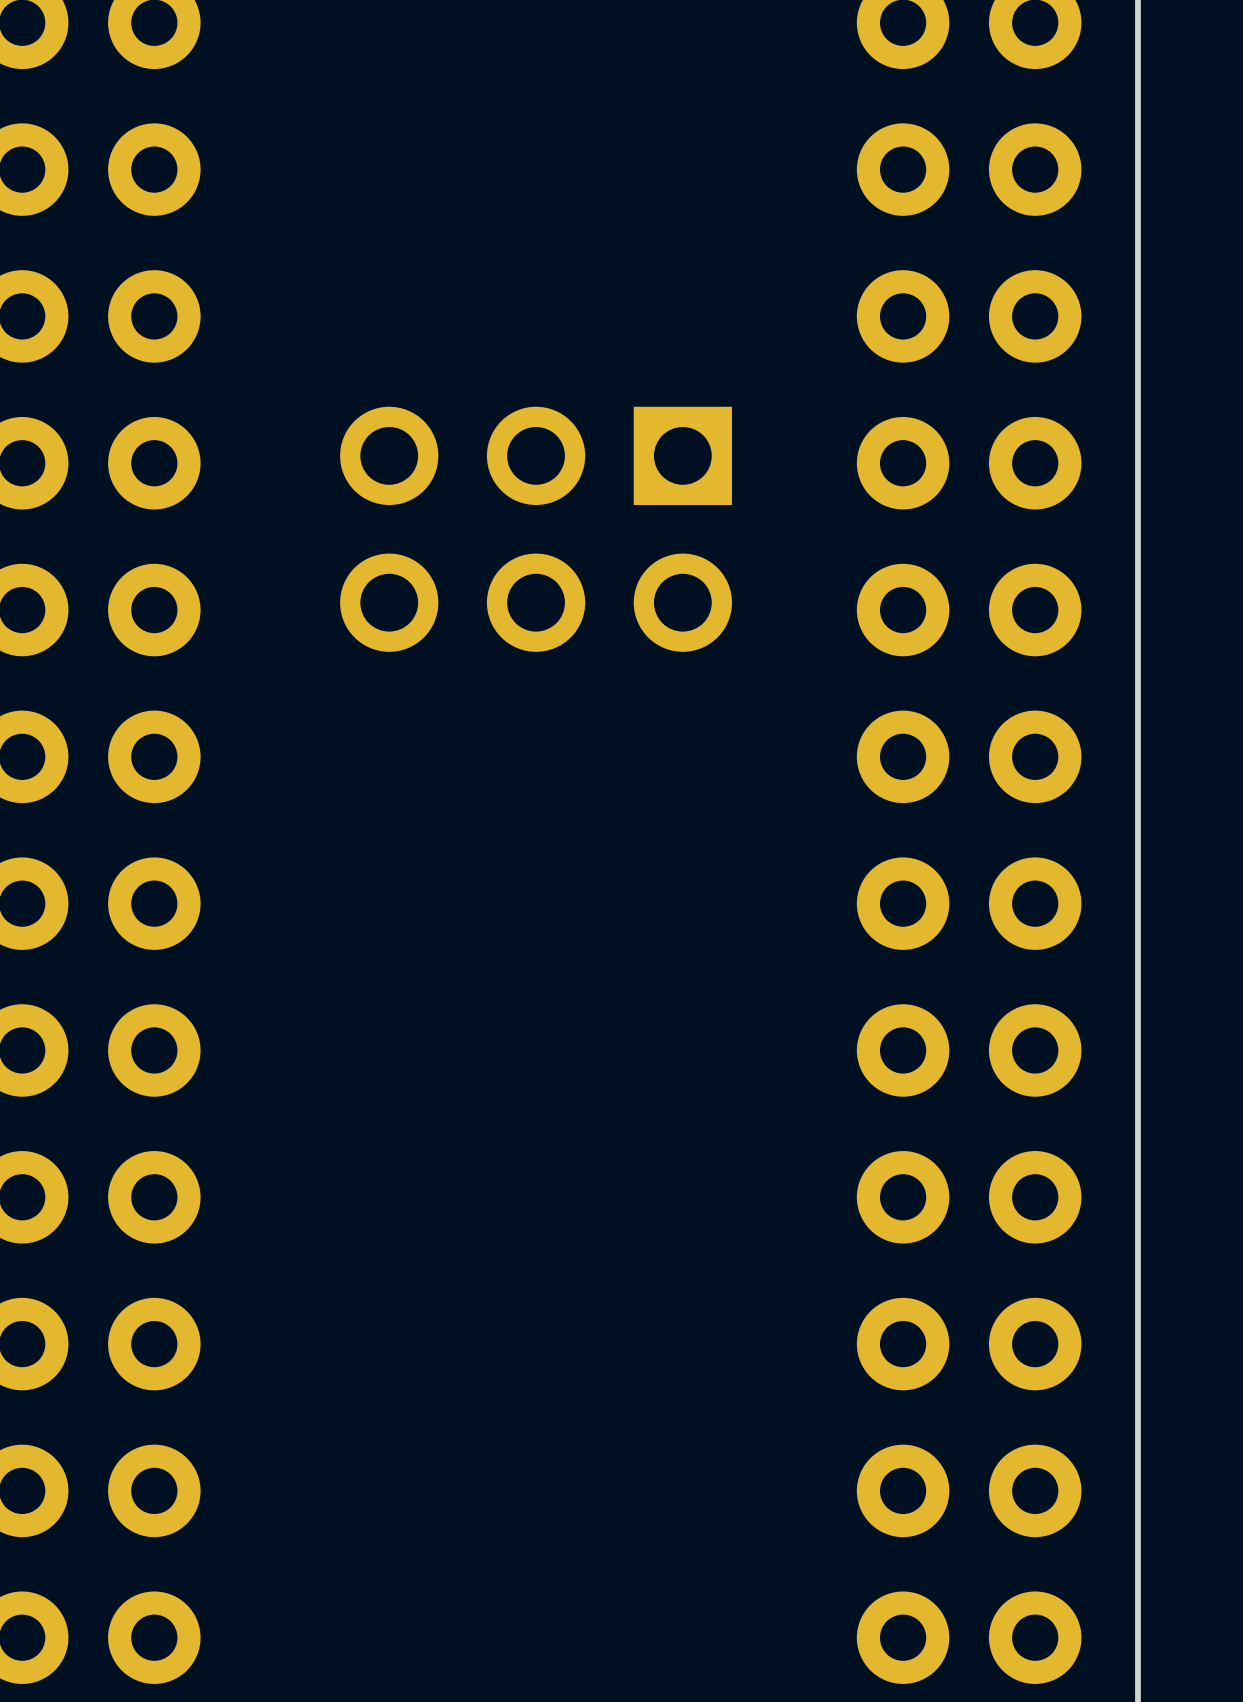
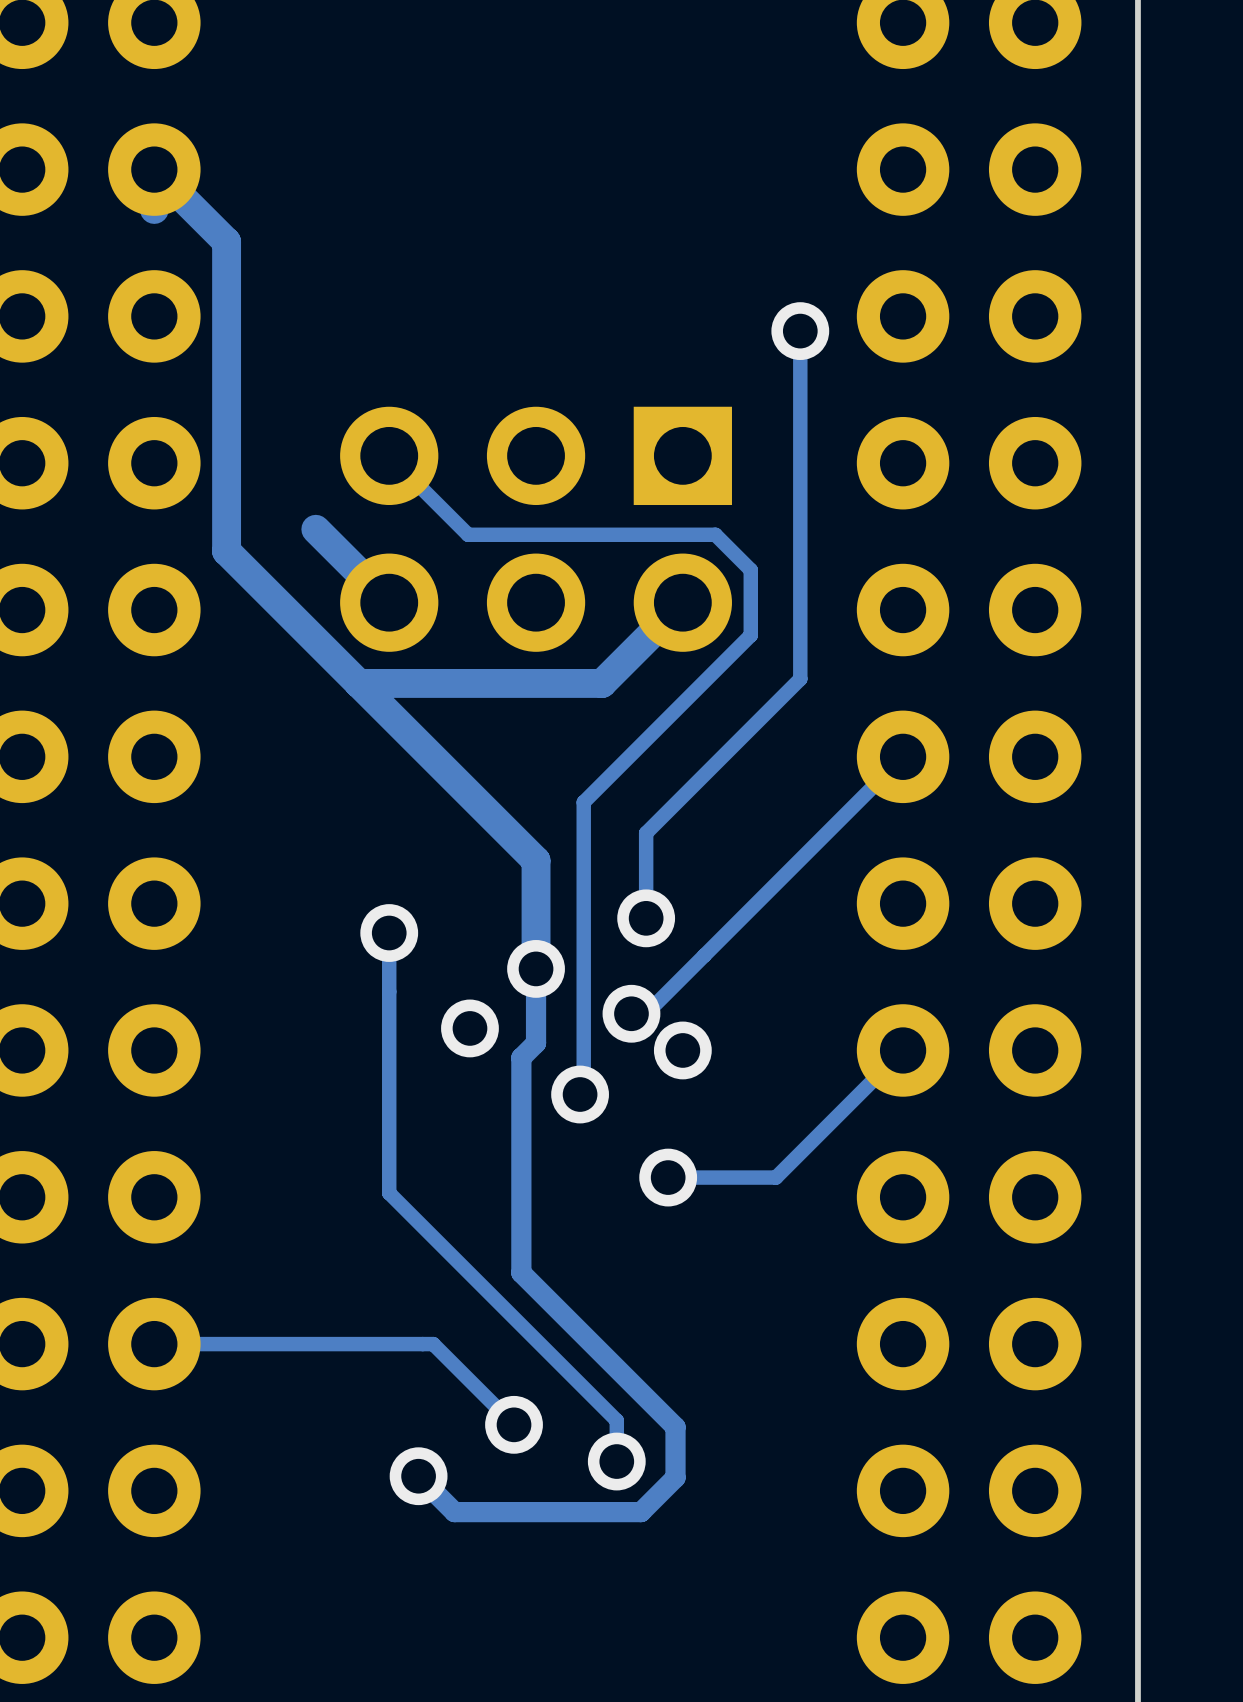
track: none -> (154, 209) (154, 169) (226, 241) (226, 551) (536, 860) (536, 1043) (521, 1057) (521, 1272) (675, 1427) (675, 1477) (641, 1512) (454, 1512) (418, 1476)
track: none -> (800, 331) (800, 678) (646, 833) (646, 918)
via: none -> (800, 331)
track: none -> (389, 455) (468, 534) (715, 534) (750, 570) (750, 635) (583, 802) (583, 1090) (580, 1094)
track: none -> (315, 529) (389, 602)
track: none -> (682, 602) (602, 683) (358, 683)
track: none -> (903, 756) (646, 1013) (631, 1013)
via: none -> (646, 918)
track: none -> (389, 933) (389, 1193) (616, 1420) (616, 1461)
via: none -> (389, 933)
via: none -> (536, 968)
via: none -> (631, 1013)
via: none -> (469, 1028)
via: none -> (682, 1050)
track: none -> (903, 1050) (775, 1177) (668, 1177)
via: none -> (580, 1094)
via: none -> (668, 1177)
track: none -> (154, 1344) (433, 1344) (514, 1424)
via: none -> (514, 1424)
via: none -> (616, 1461)
via: none -> (418, 1476)

